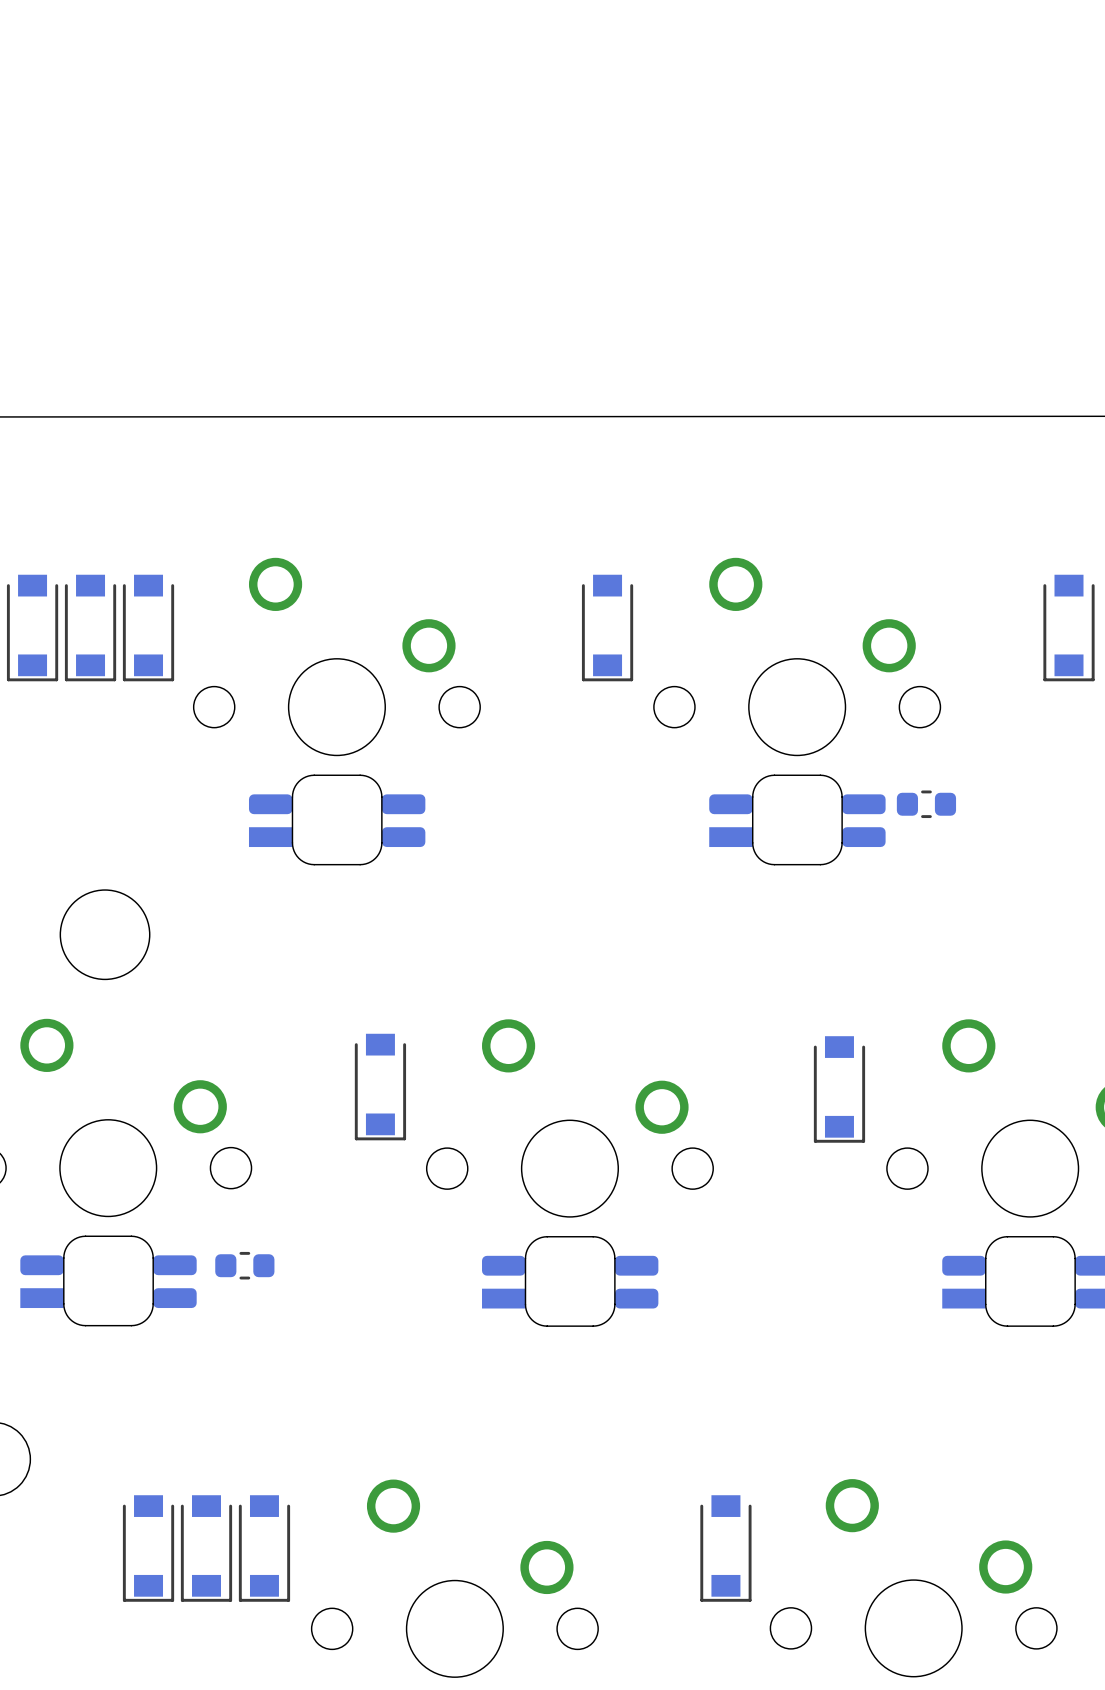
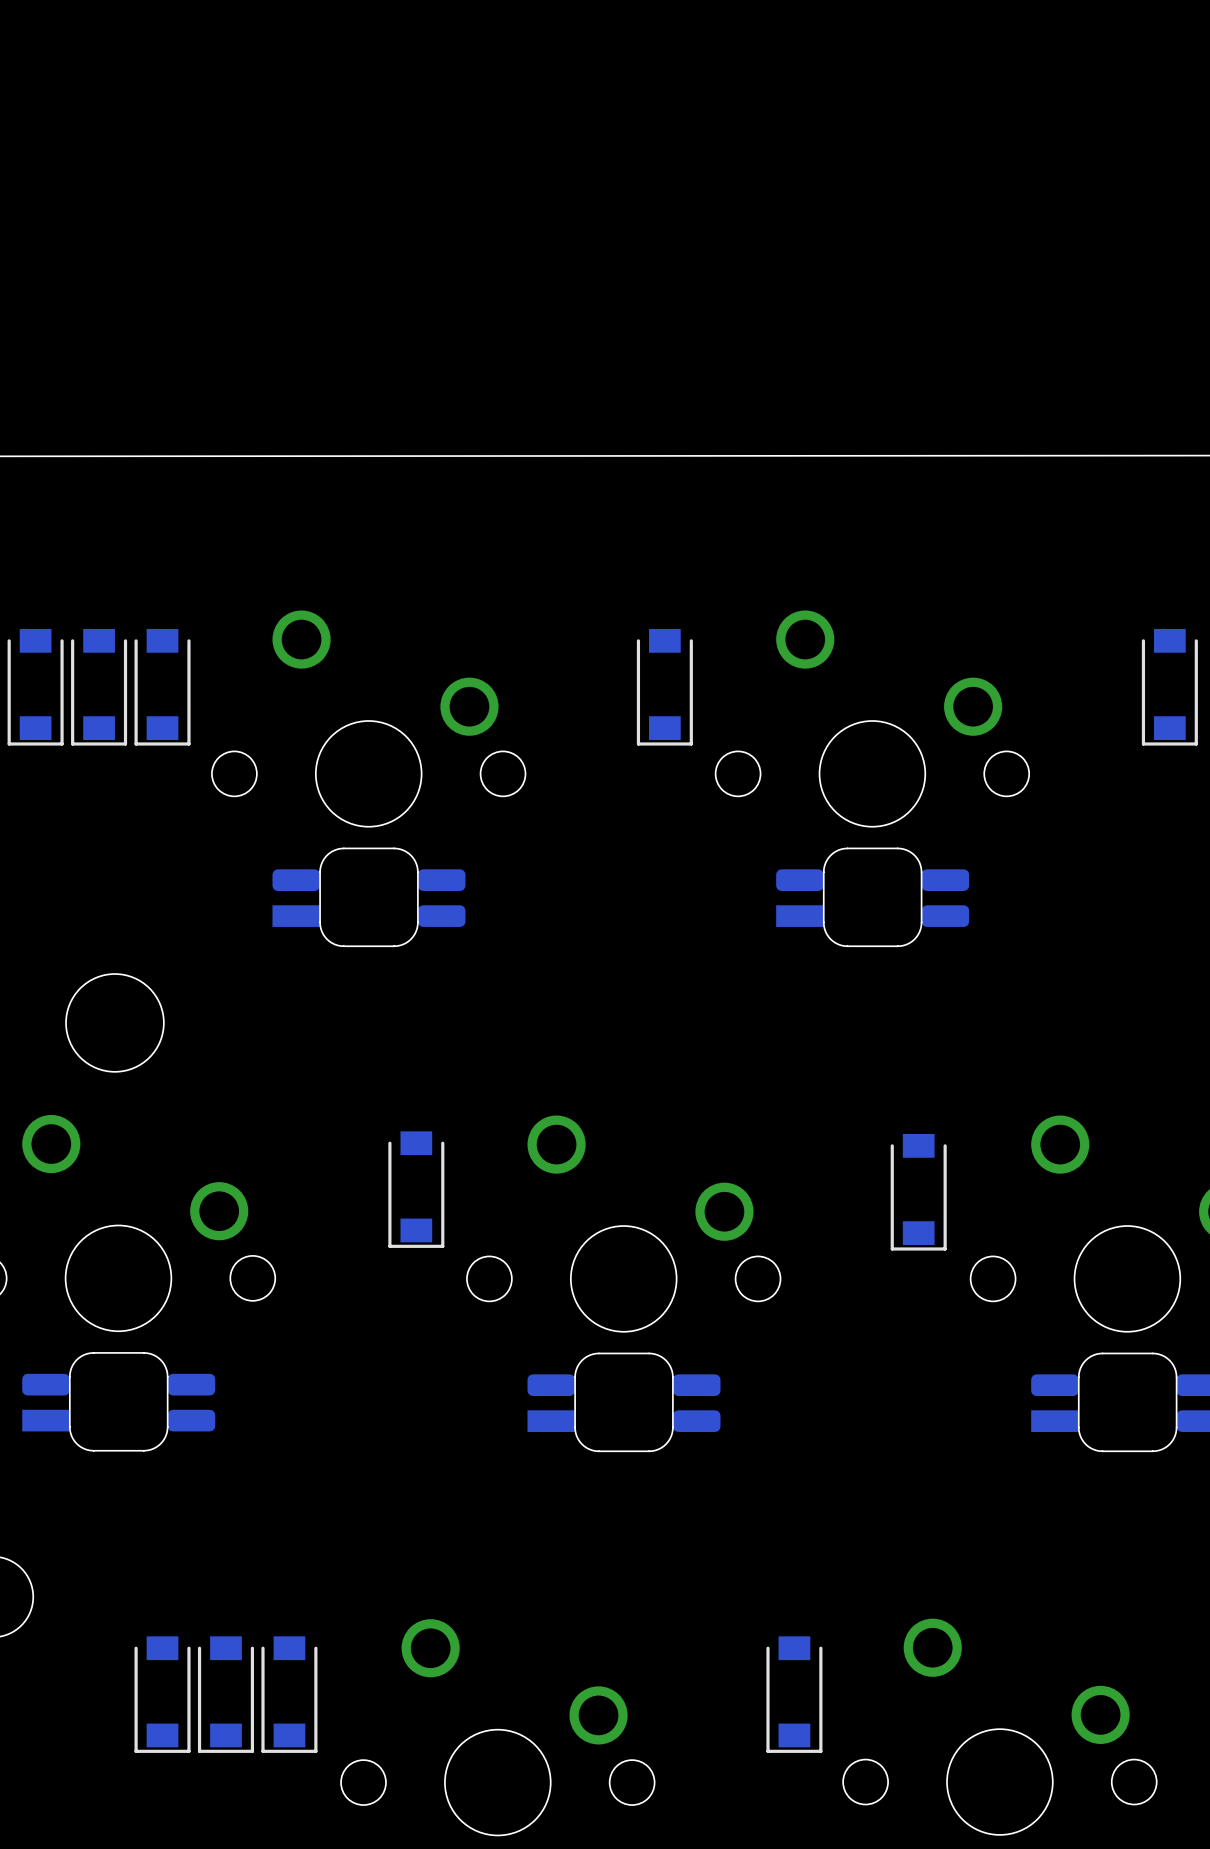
part: (926, 804) -> none
part: (244, 1265) -> none

